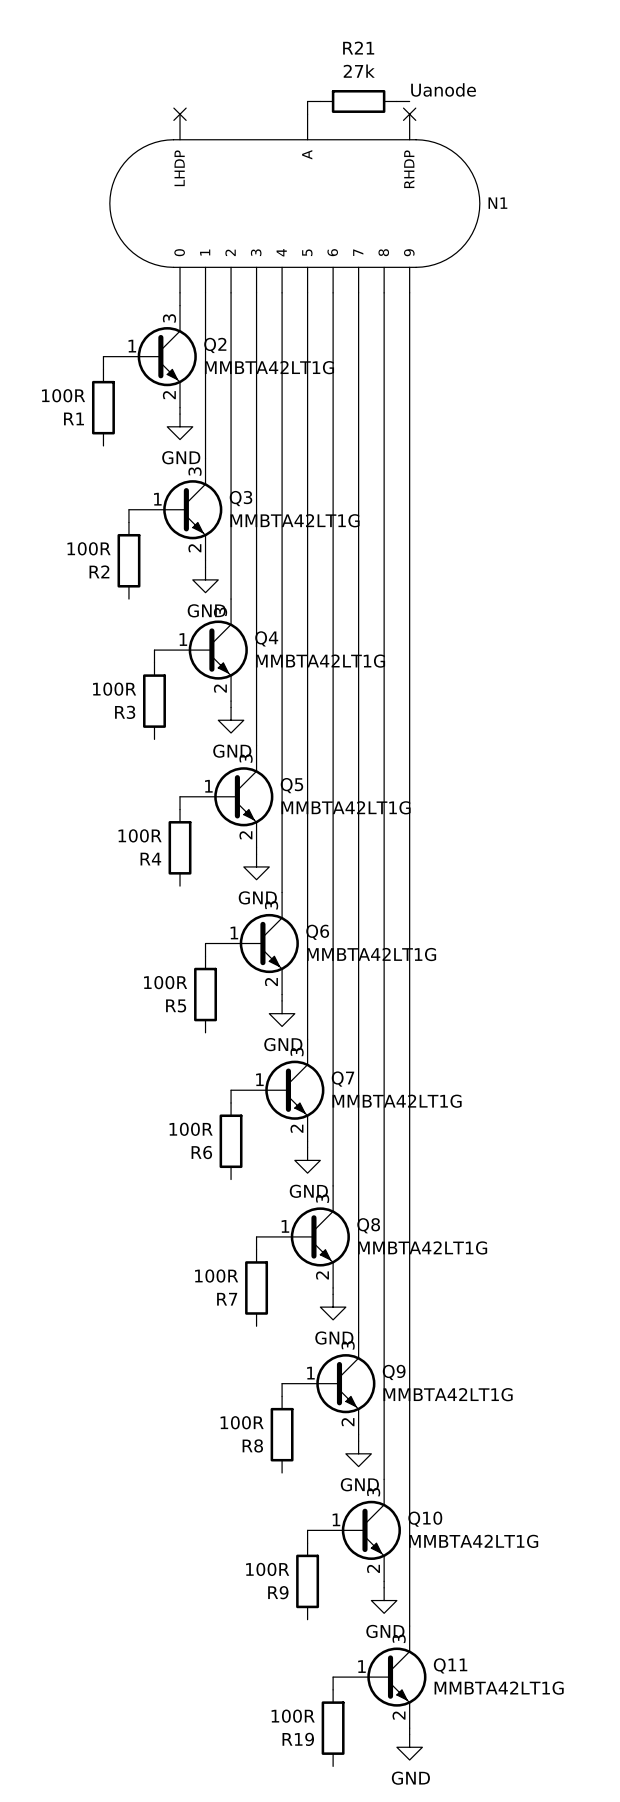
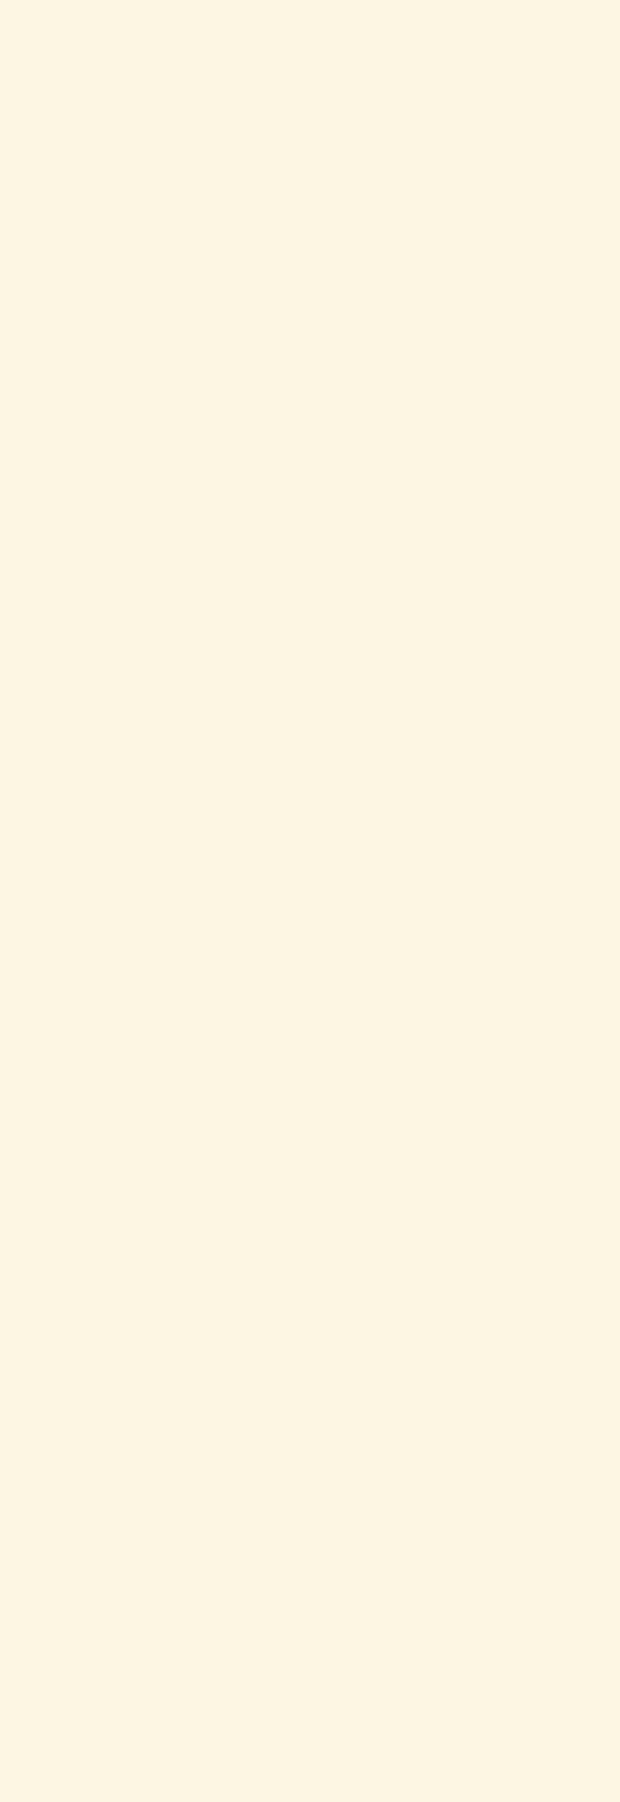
label: Uanode (443, 89) -> none
wire: (320, 101) (307, 101) (307, 114) -> none
R21: 27k (358, 101) -> none
wire: (396, 101) (409, 101) -> none
no-connect mark: (180, 114) -> none
no-connect mark: (409, 114) -> none
N1: (294, 203) -> none
wire: (180, 292) (180, 305) -> none
wire: (205, 292) (205, 458) -> none
wire: (231, 292) (231, 599) -> none
wire: (256, 292) (256, 745) -> none
wire: (282, 292) (282, 892) -> none
wire: (307, 292) (307, 1039) -> none
wire: (333, 292) (333, 1185) -> none
wire: (358, 292) (358, 1332) -> none
wire: (384, 292) (384, 1479) -> none
wire: (409, 292) (409, 1626) -> none
wire: (103, 356) (103, 369) -> none
Q2: MMBTA42LT1G (150, 356) -> none
R1: 100R (103, 407) -> none
wire: (180, 407) (180, 414) -> none
power symbol: GND (180, 426) -> none
wire: (128, 509) (128, 522) -> none
Q3: MMBTA42LT1G (175, 509) -> none
R2: 100R (128, 560) -> none
wire: (205, 560) (205, 567) -> none
power symbol: GND (205, 579) -> none
wire: (154, 650) (154, 662) -> none
Q4: MMBTA42LT1G (201, 650) -> none
R3: 100R (154, 701) -> none
wire: (231, 701) (231, 707) -> none
power symbol: GND (231, 720) -> none
wire: (180, 796) (180, 809) -> none
Q5: MMBTA42LT1G (226, 796) -> none
R4: 100R (180, 847) -> none
wire: (256, 847) (256, 854) -> none
power symbol: GND (256, 866) -> none
wire: (205, 943) (205, 956) -> none
Q6: MMBTA42LT1G (252, 943) -> none
R5: 100R (205, 994) -> none
wire: (282, 994) (282, 1000) -> none
power symbol: GND (282, 1013) -> none
wire: (231, 1090) (231, 1102) -> none
Q7: MMBTA42LT1G (277, 1090) -> none
R6: 100R (231, 1141) -> none
wire: (307, 1141) (307, 1147) -> none
power symbol: GND (307, 1160) -> none
wire: (256, 1236) (256, 1249) -> none
Q8: MMBTA42LT1G (303, 1236) -> none
R7: 100R (256, 1287) -> none
wire: (333, 1287) (333, 1294) -> none
power symbol: GND (333, 1307) -> none
wire: (282, 1383) (282, 1396) -> none
Q9: MMBTA42LT1G (328, 1383) -> none
R8: 100R (282, 1434) -> none
wire: (358, 1434) (358, 1441) -> none
power symbol: GND (358, 1453) -> none
wire: (307, 1530) (307, 1543) -> none
Q10: MMBTA42LT1G (354, 1530) -> none
R9: 100R (307, 1581) -> none
wire: (384, 1581) (384, 1587) -> none
power symbol: GND (384, 1600) -> none
wire: (333, 1677) (333, 1689) -> none
Q11: MMBTA42LT1G (379, 1677) -> none
R19: 100R (333, 1728) -> none
wire: (409, 1728) (409, 1734) -> none
power symbol: GND (409, 1747) -> none

